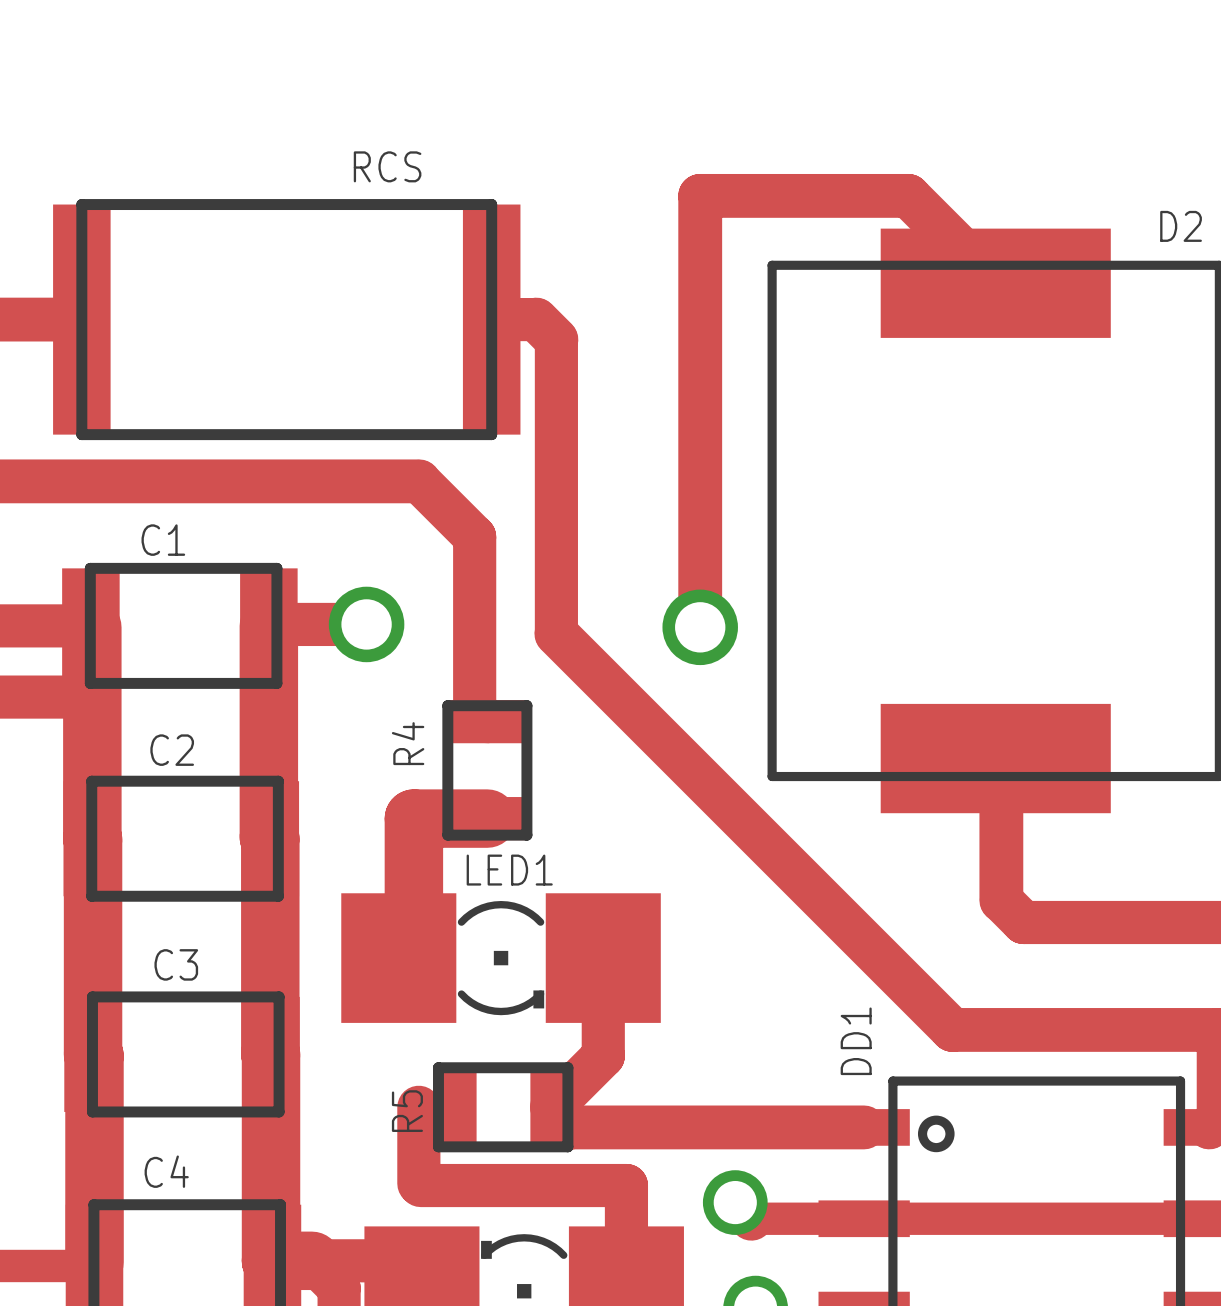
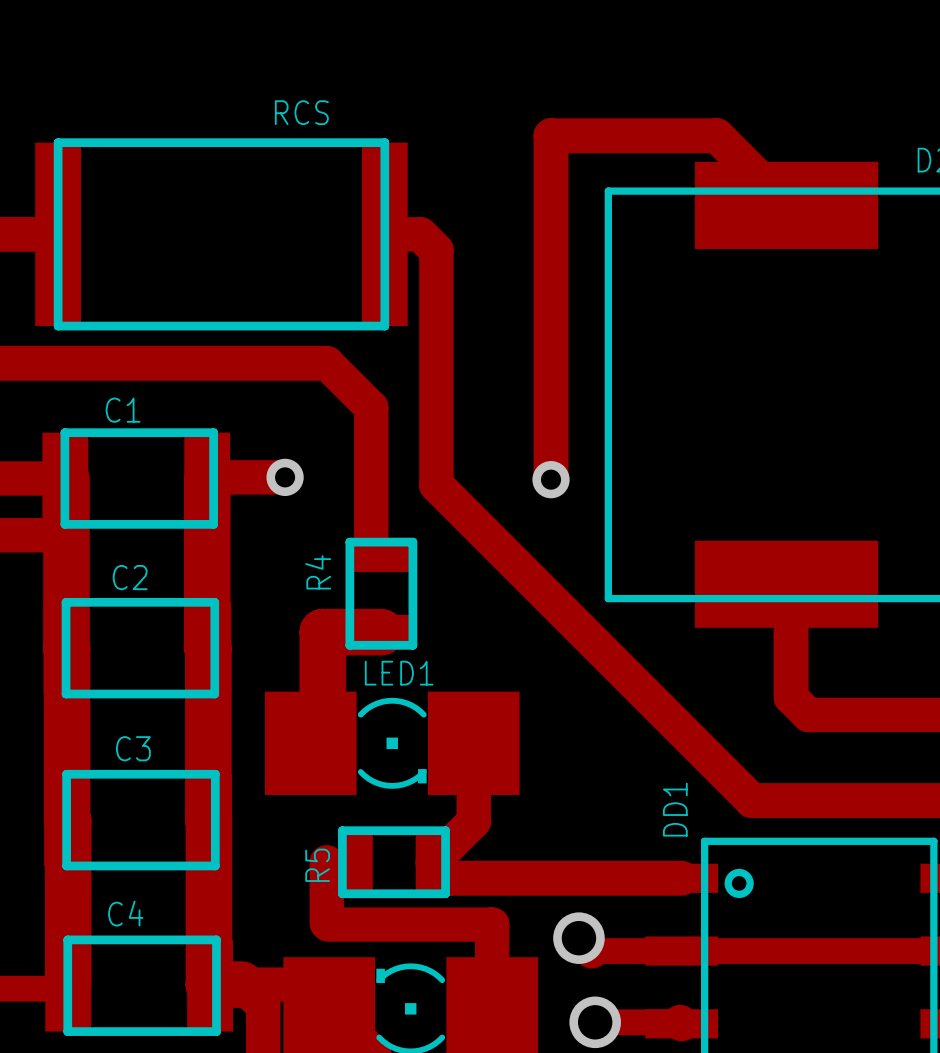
via size: [328, 586, 405, 663] -> [266, 458, 304, 497]
via size: [662, 589, 738, 666] -> [532, 461, 570, 499]

